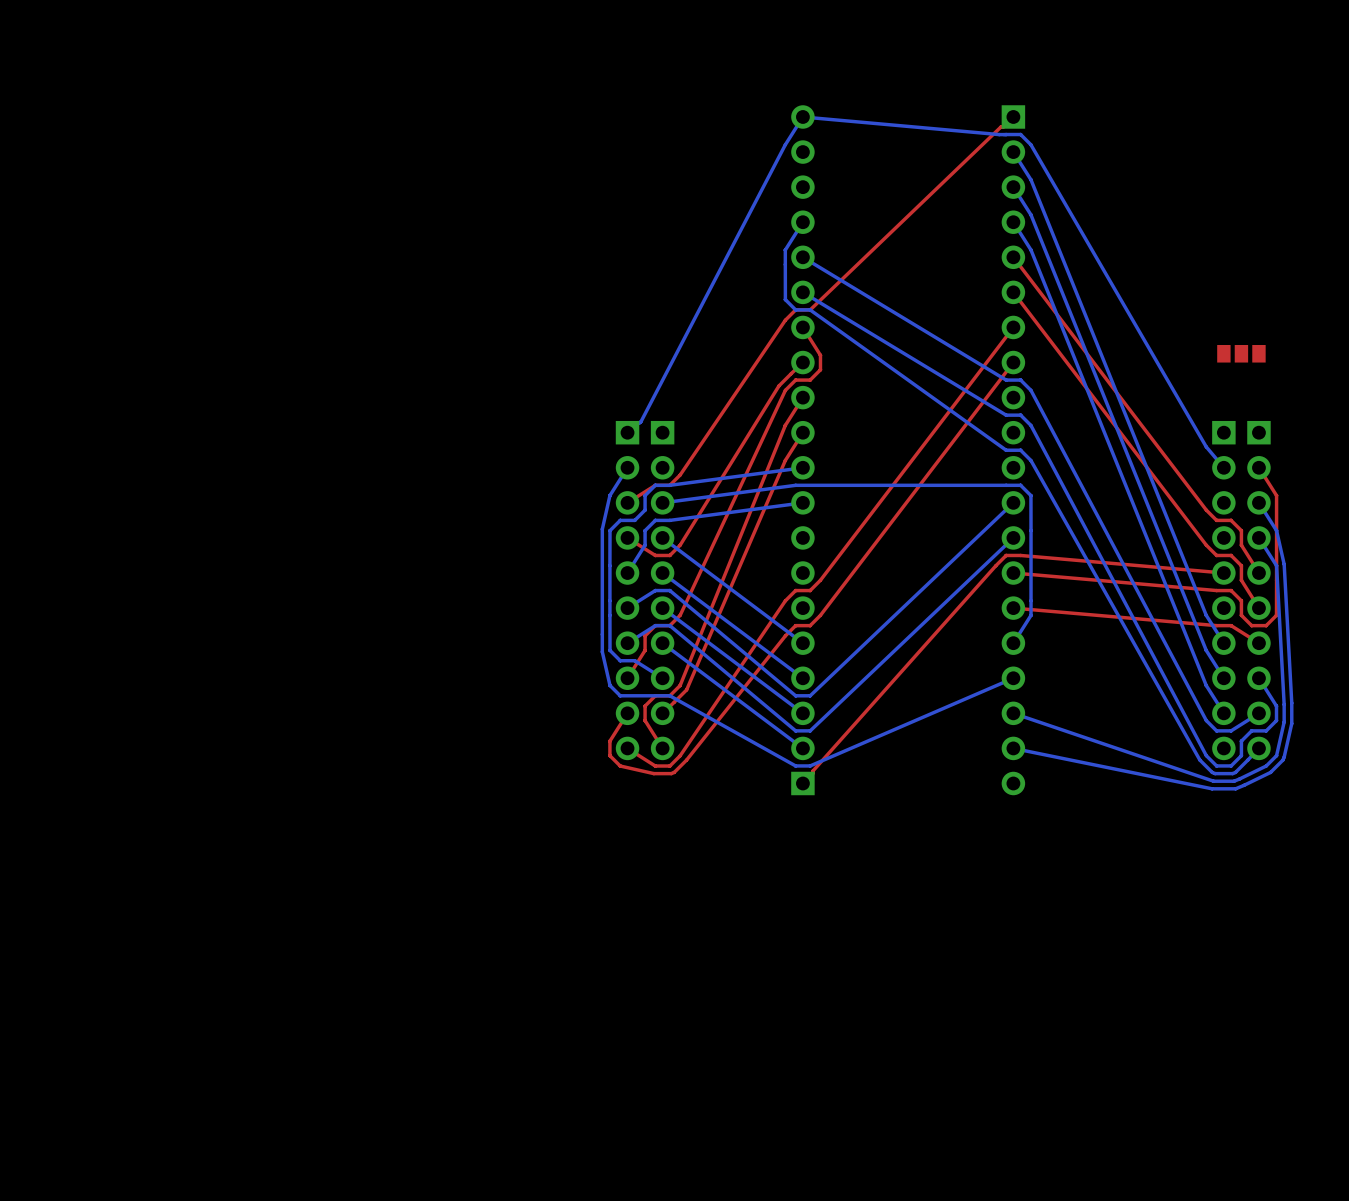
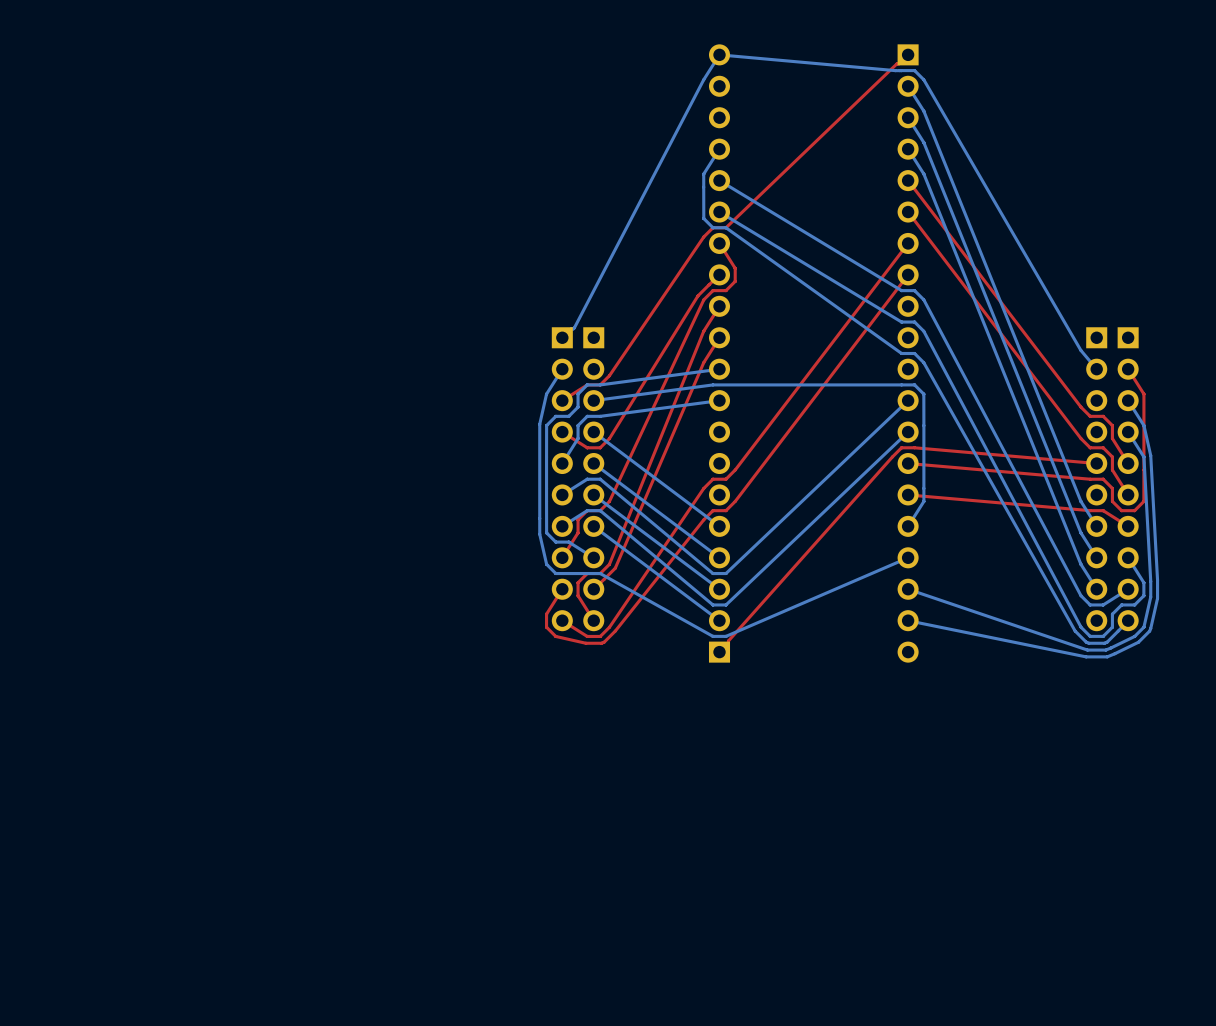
part: (1241, 353) -> none

